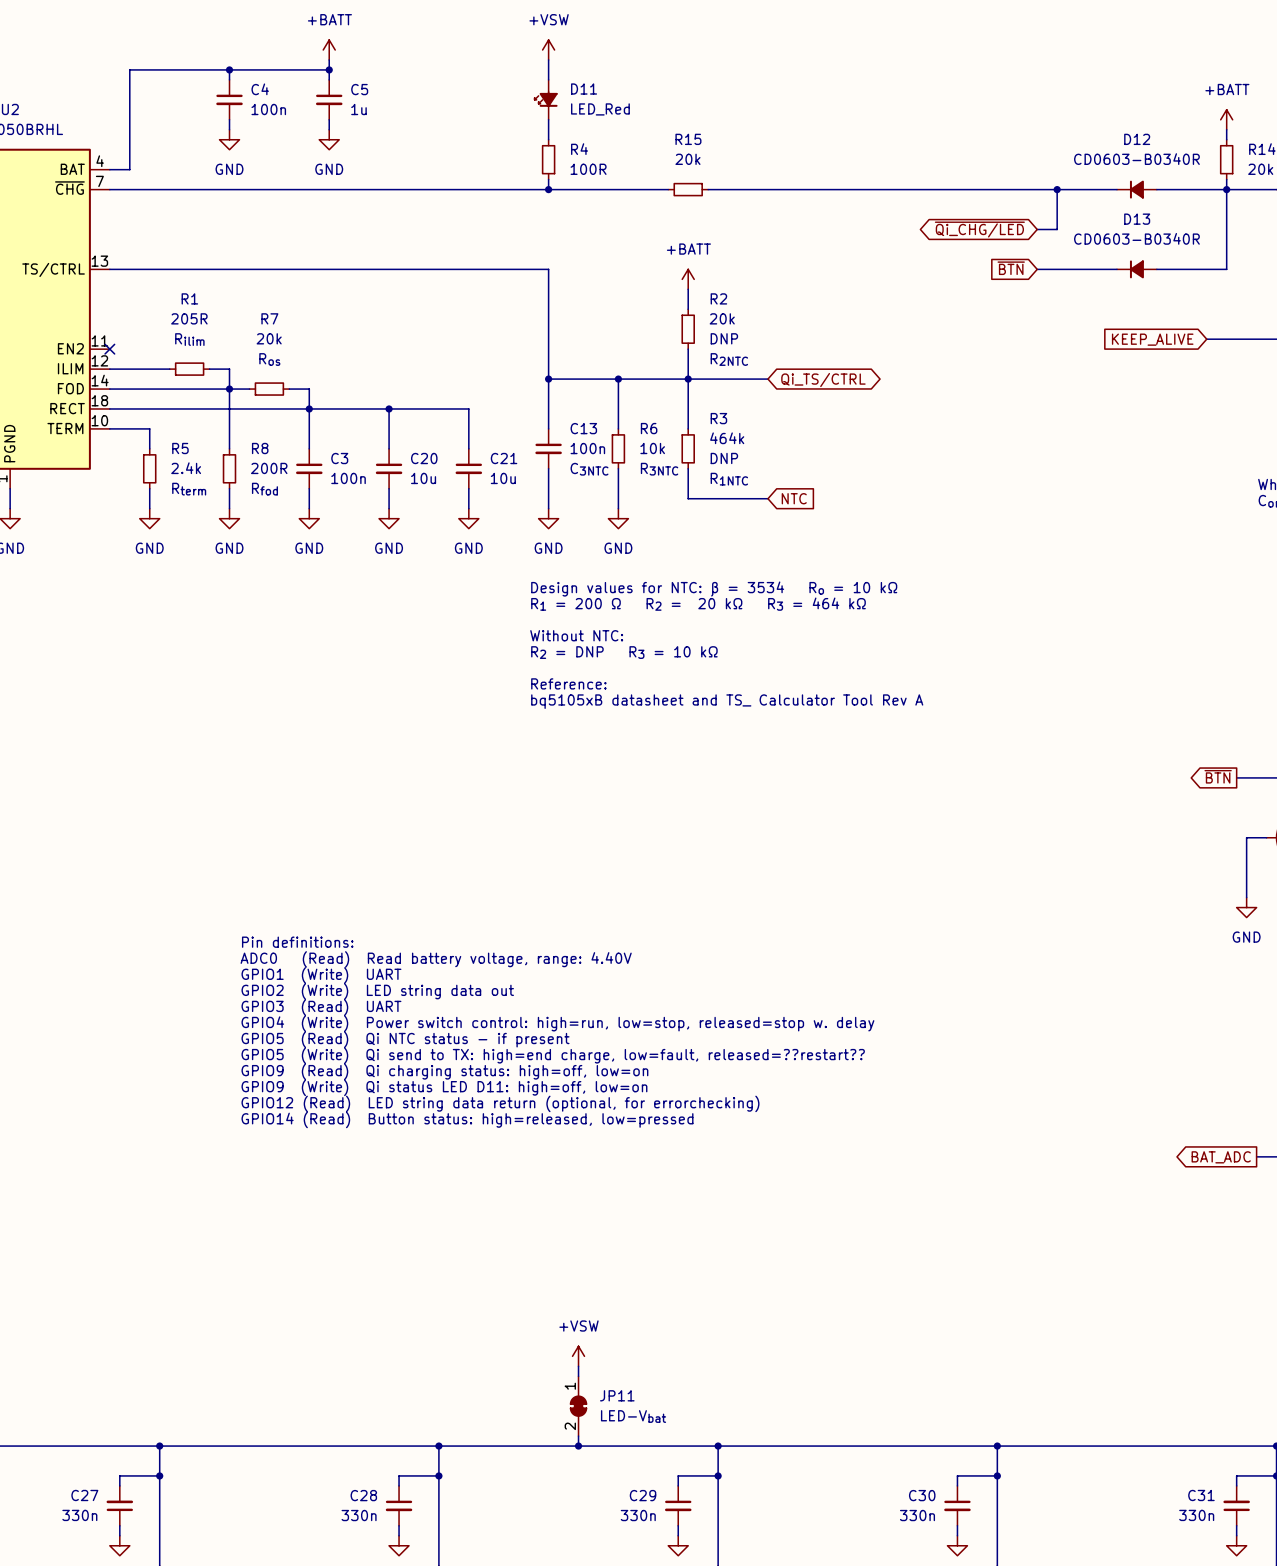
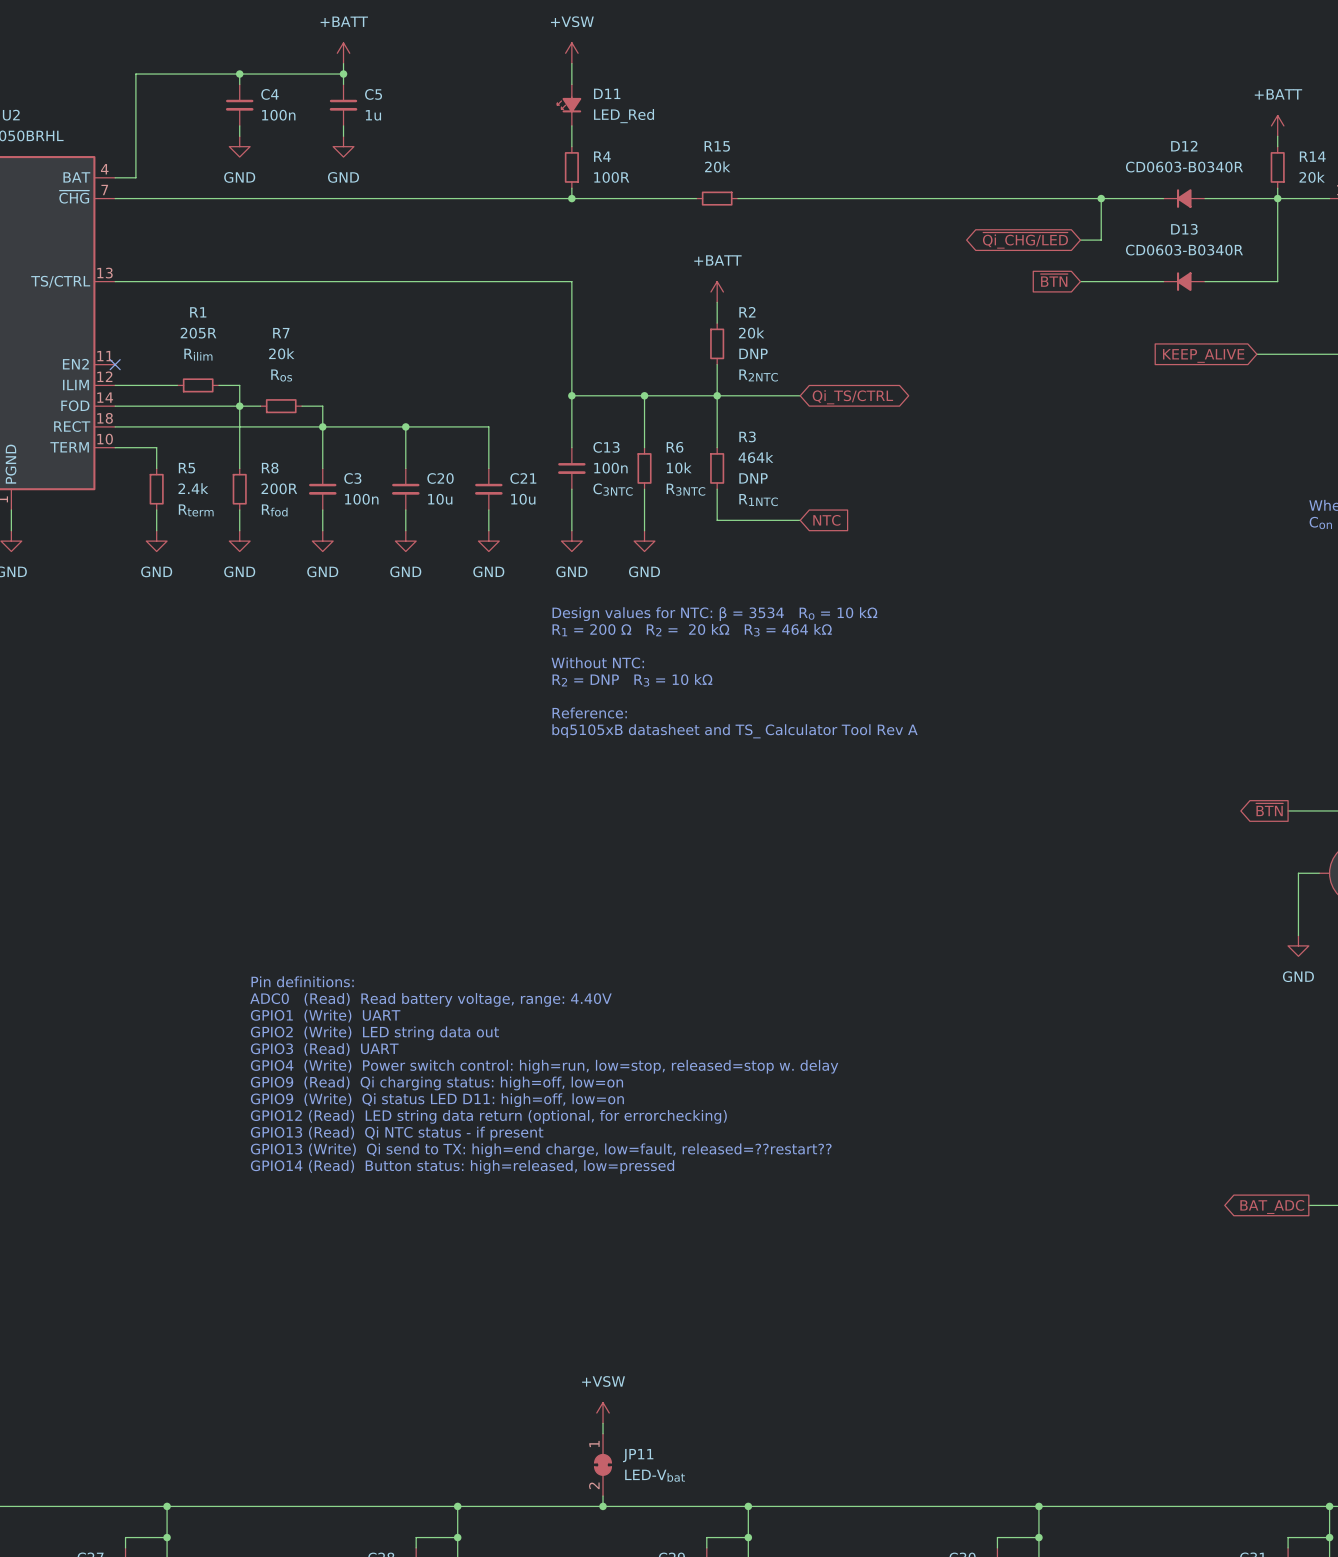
text: GPIO5 (Read) Qi NTC status - if present (405, 1039) -> GPIO9 (Read) Qi charging status: high=off, low=on (436, 1083)
text: GPIO5 (Write) Qi send to TX: high=end charge, low=fault, released=??restart?? (553, 1055) -> GPIO9 (Write) Qi status LED D11: high=off, low=on (437, 1100)
text: GPIO9 (Read) Qi charging status: high=off, low=on (444, 1071) -> GPIO12 (Read) LED string data return (optional, for errorchecking) (488, 1116)
text: GPIO9 (Write) Qi status LED D11: high=off, low=on (444, 1087) -> GPIO13 (Read) Qi NTC status - if present (397, 1133)
text: GPIO12 (Read) LED string data return (optional, for errorchecking) (500, 1103) -> GPIO13 (Write) Qi send to TX: high=end charge, low=fault, released=??restart?? (541, 1150)

